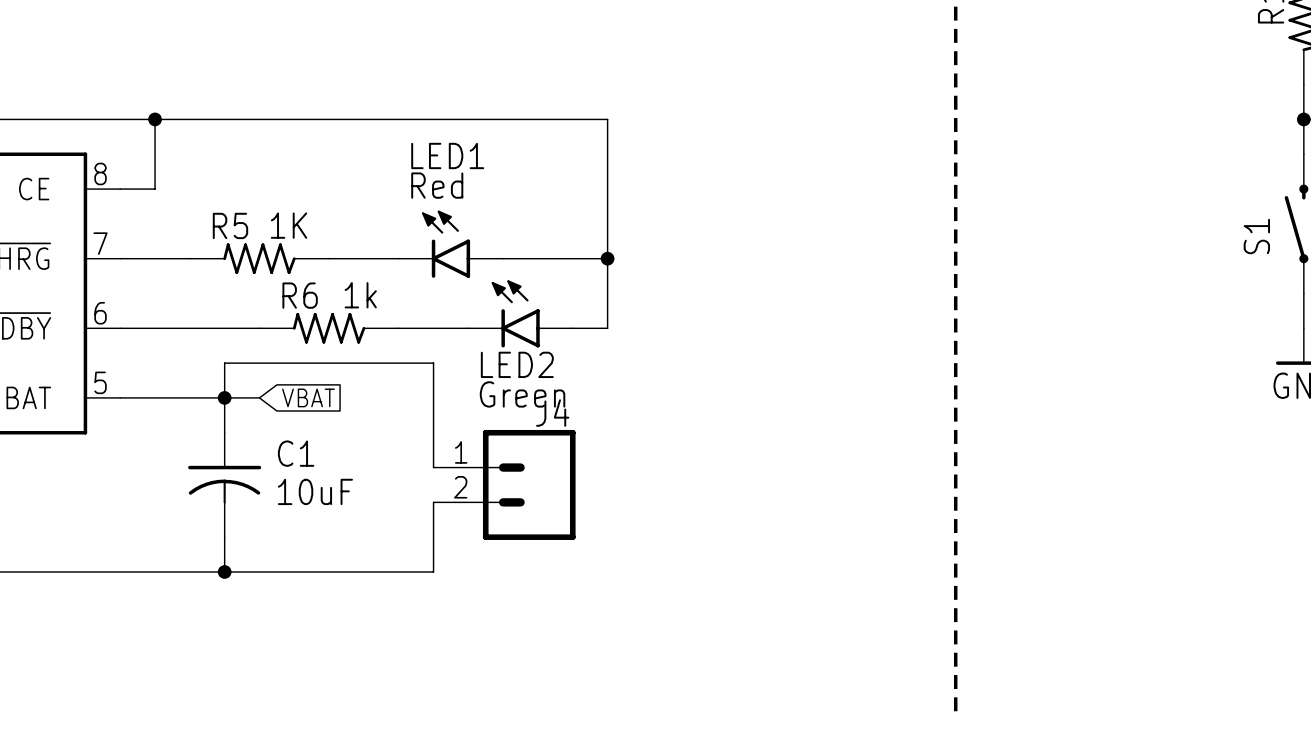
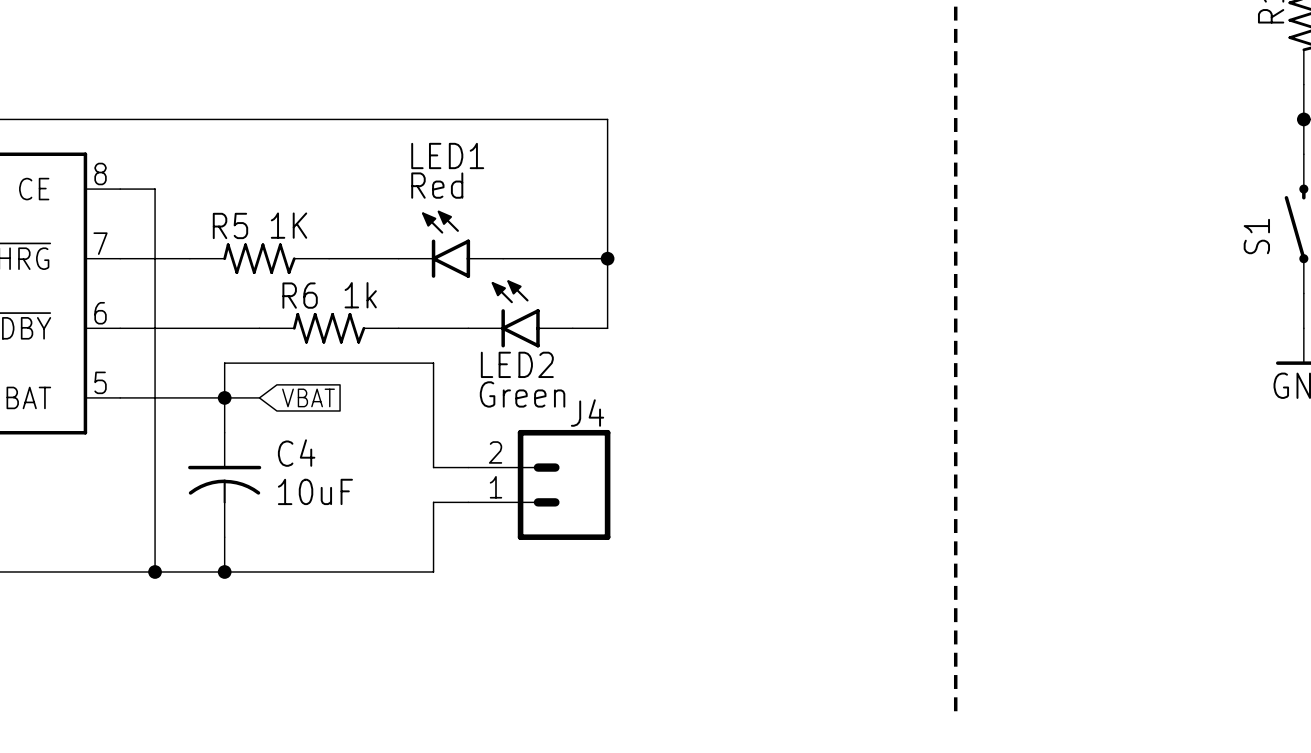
wire: (155, 119) (155, 189) -> (155, 571) (155, 189)
junction: (155, 119) -> none
C1 name: C1 (296, 453) -> C4 (296, 453)
J4 flip: as is (529, 484) -> up-down (564, 484)
junction: none -> (155, 571)

